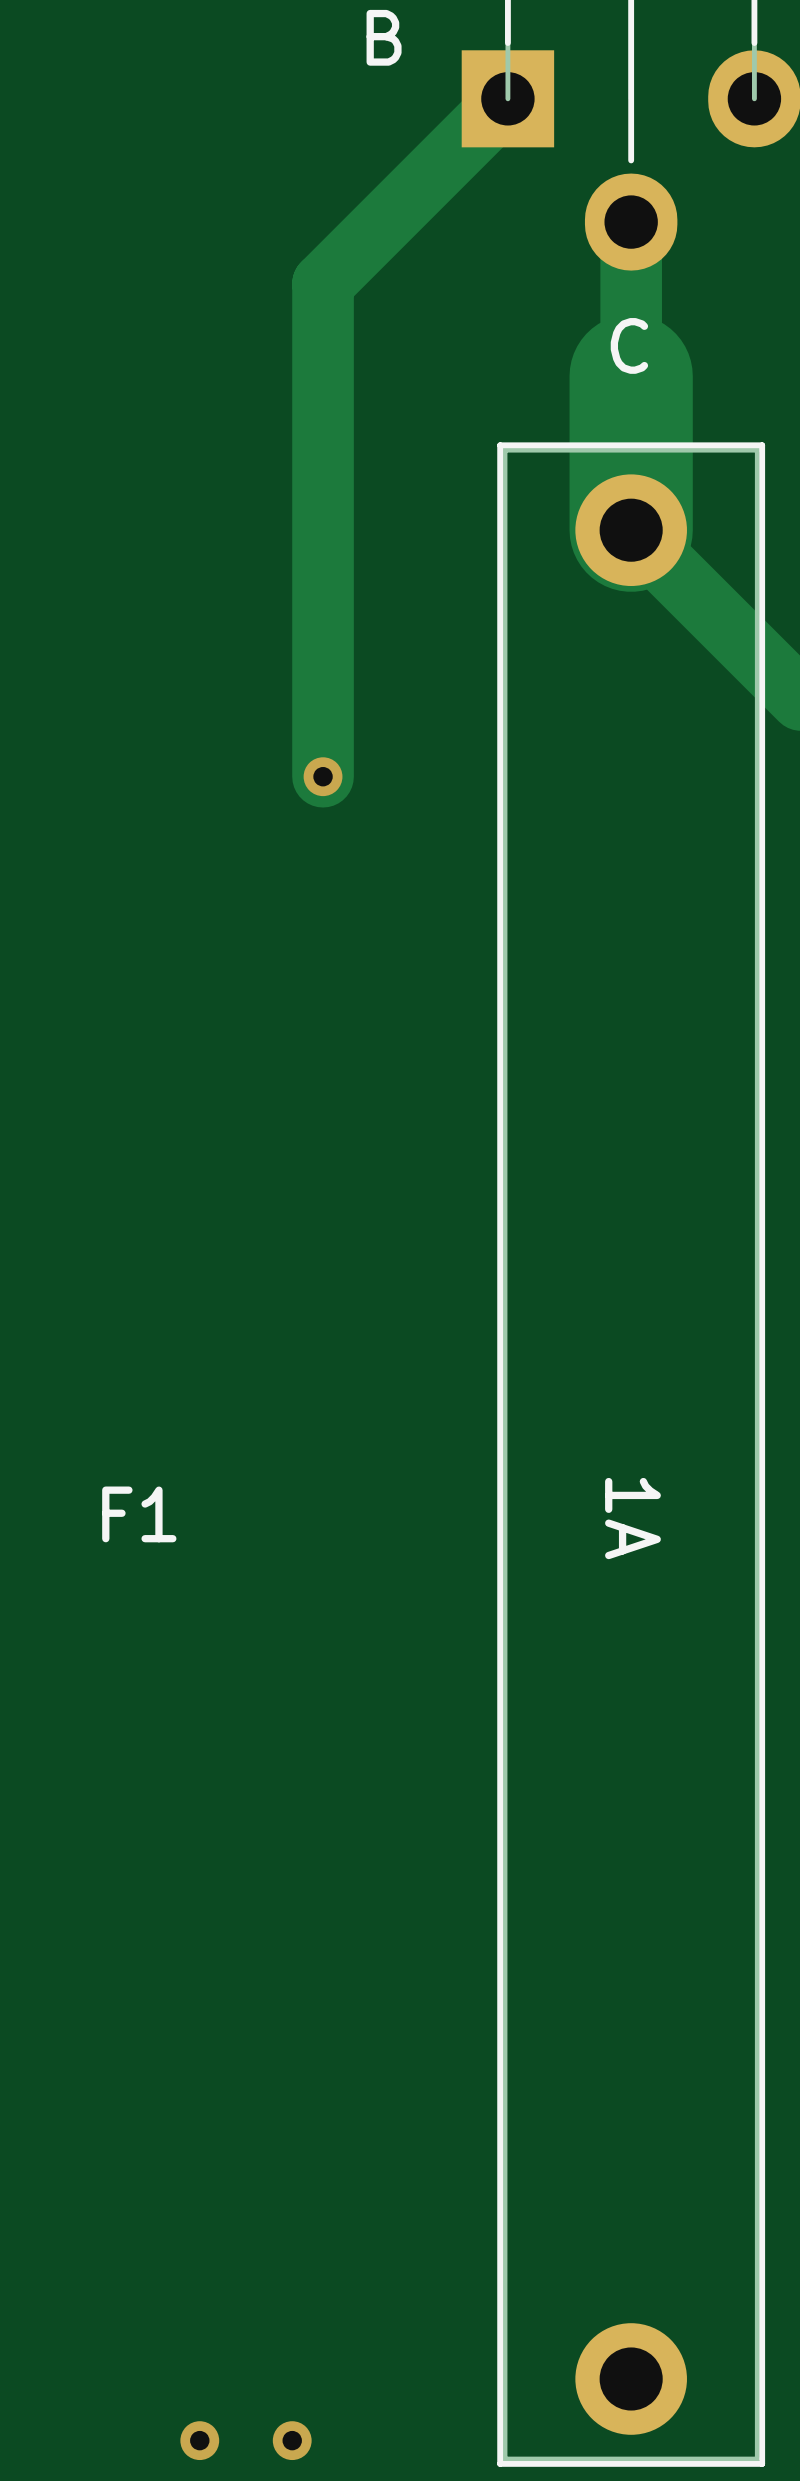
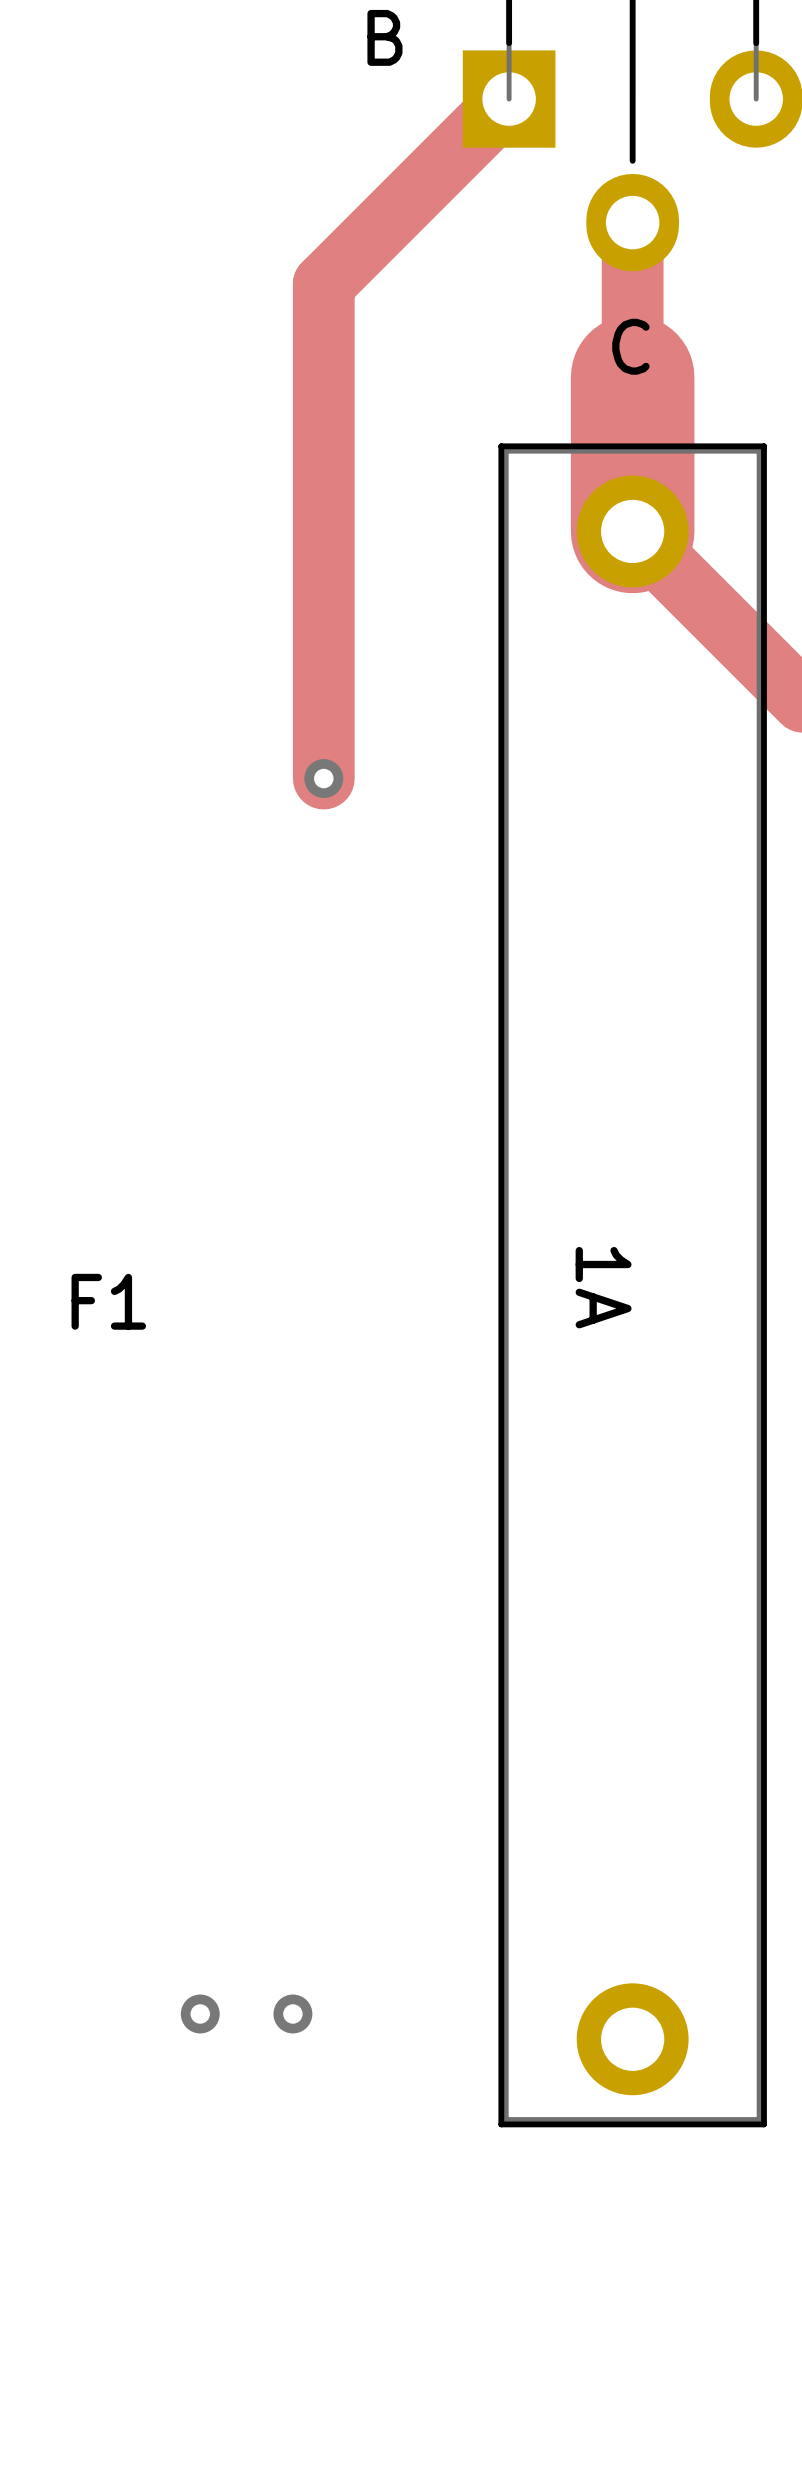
F1 footprint: [497, 442, 766, 2467] -> [498, 443, 767, 2128]
via: none -> (200, 2013)
via: none -> (292, 2013)
via: (199, 2440) -> none
via: (292, 2440) -> none

